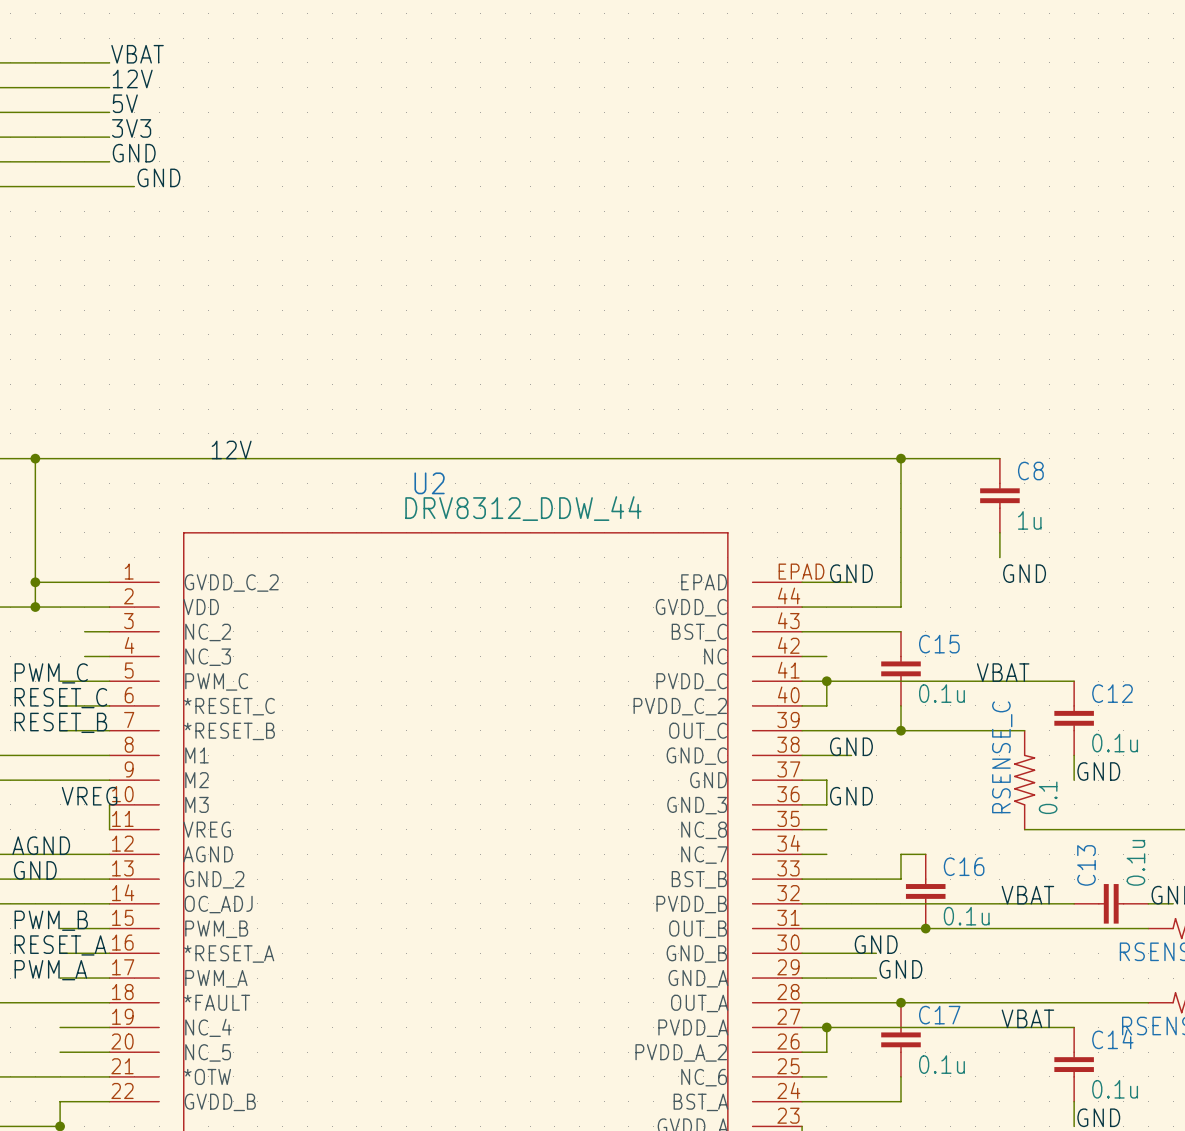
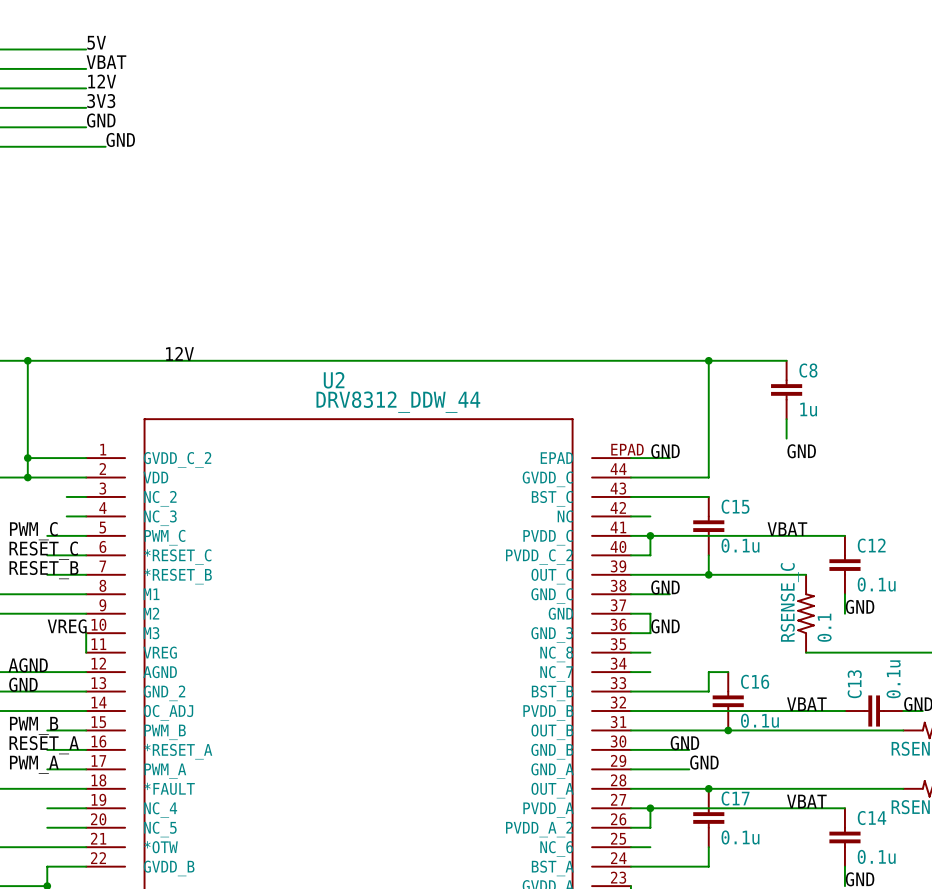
label: VBAT (137, 54) -> 5V (96, 42)
label: 12V (132, 78) -> VBAT (106, 62)
label: 5V (125, 103) -> 12V (102, 81)

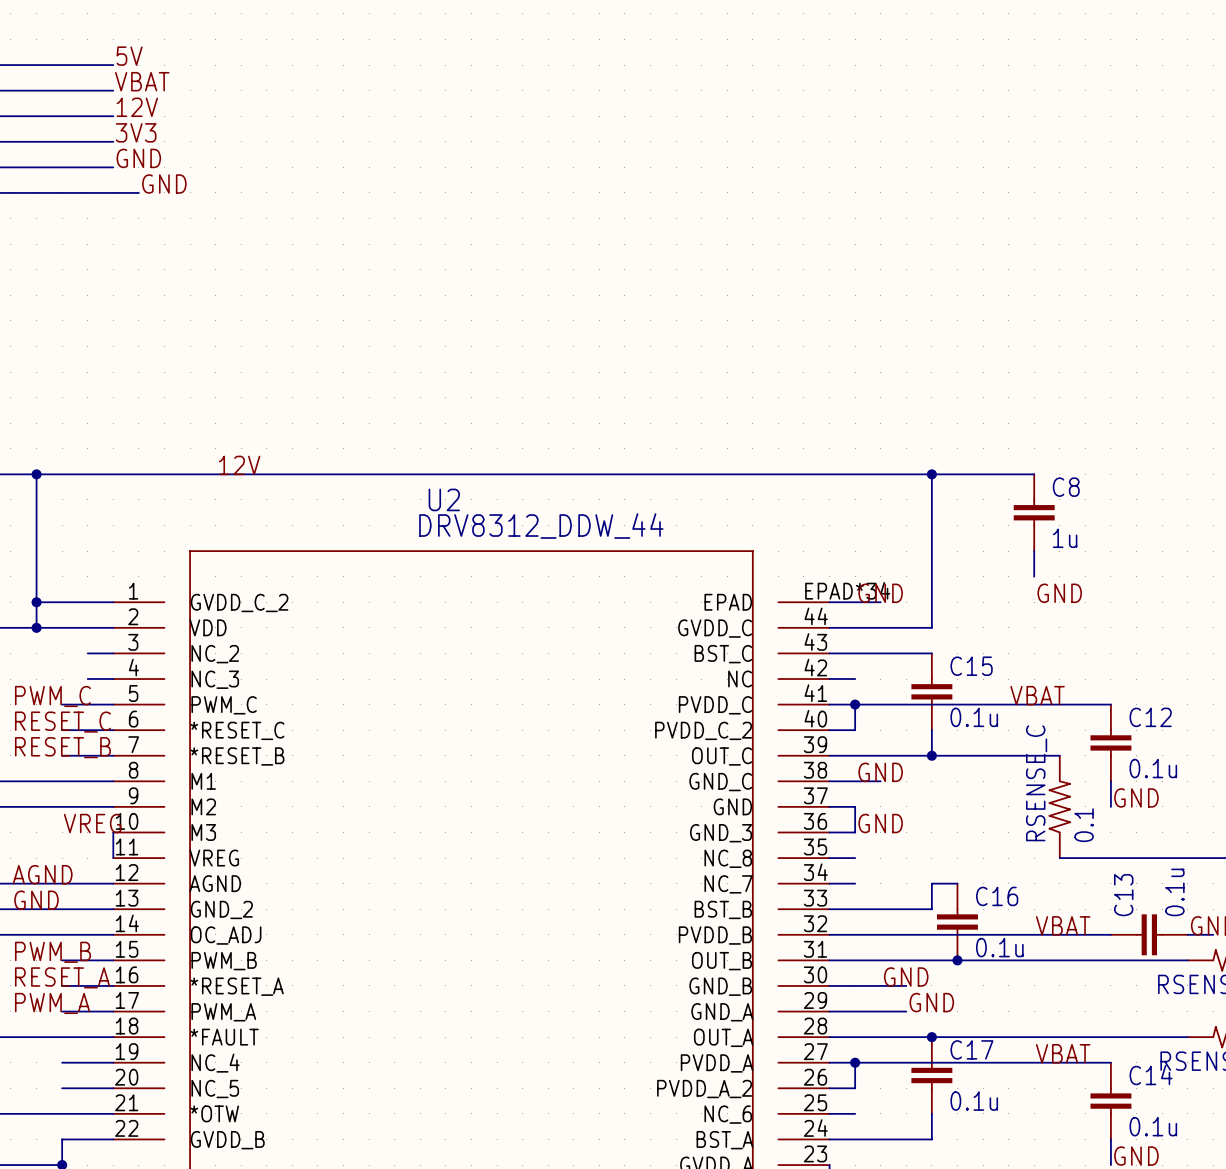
U2 pin number: EPAD (627, 449) -> EPAD*34 (847, 590)

